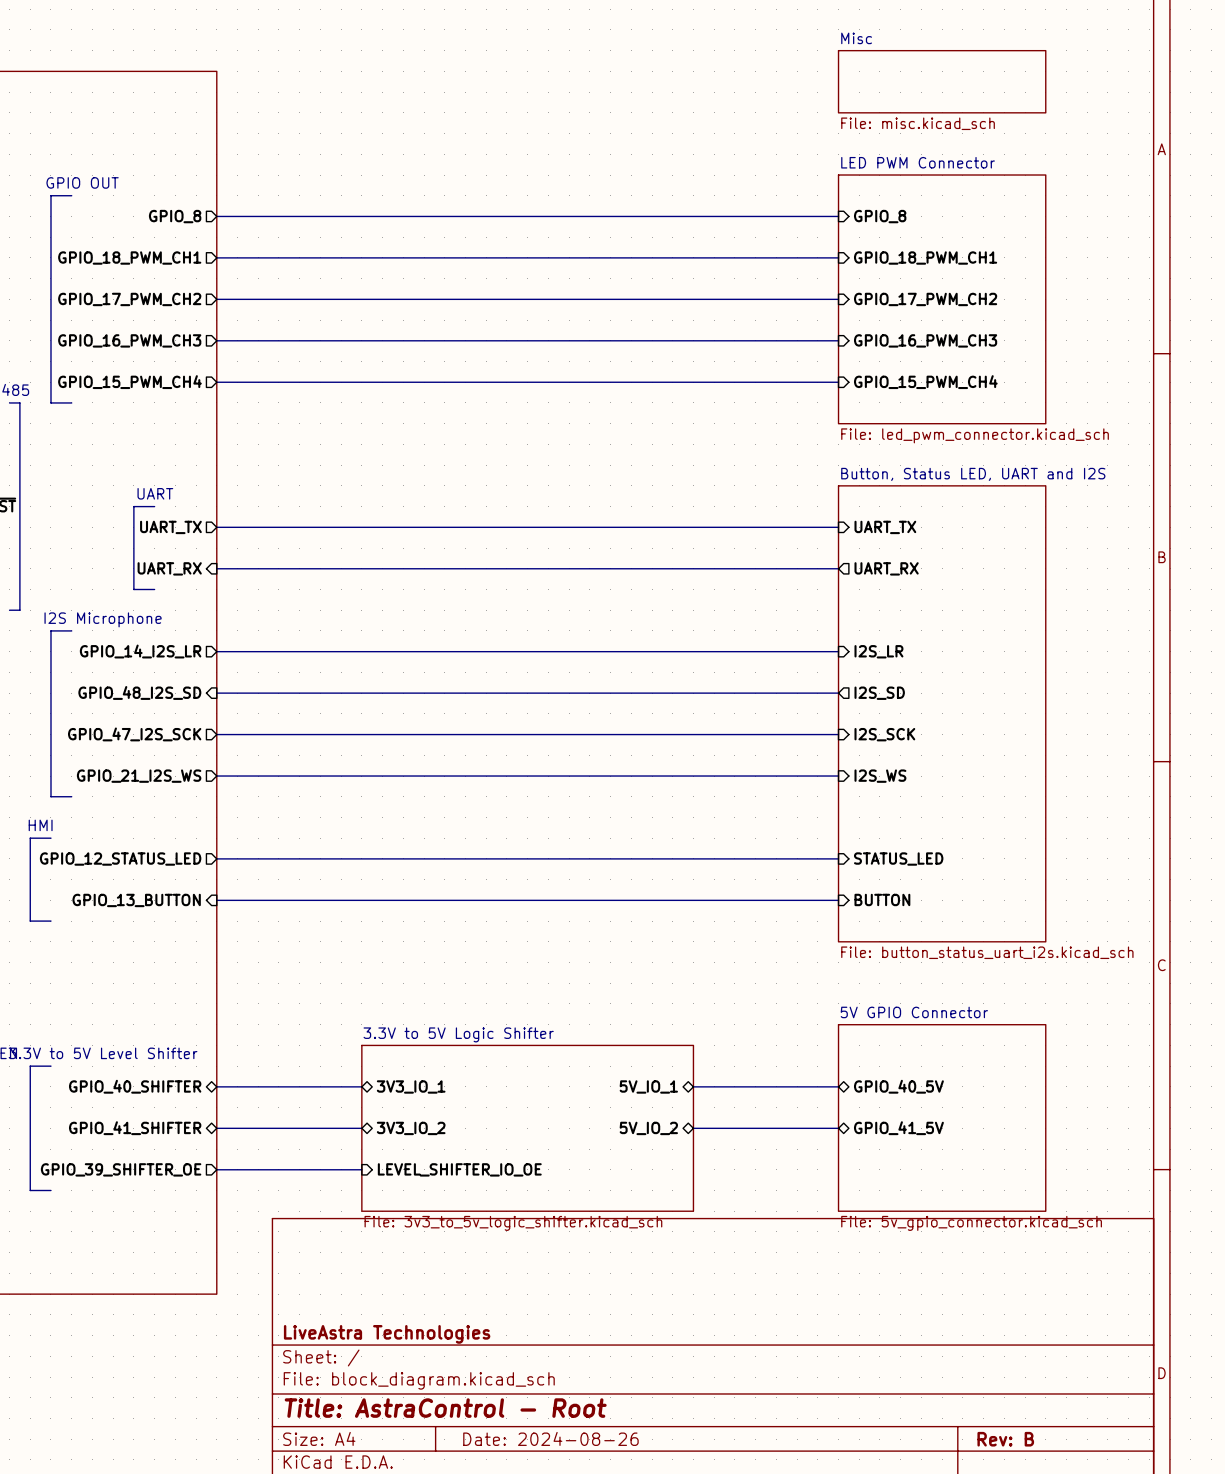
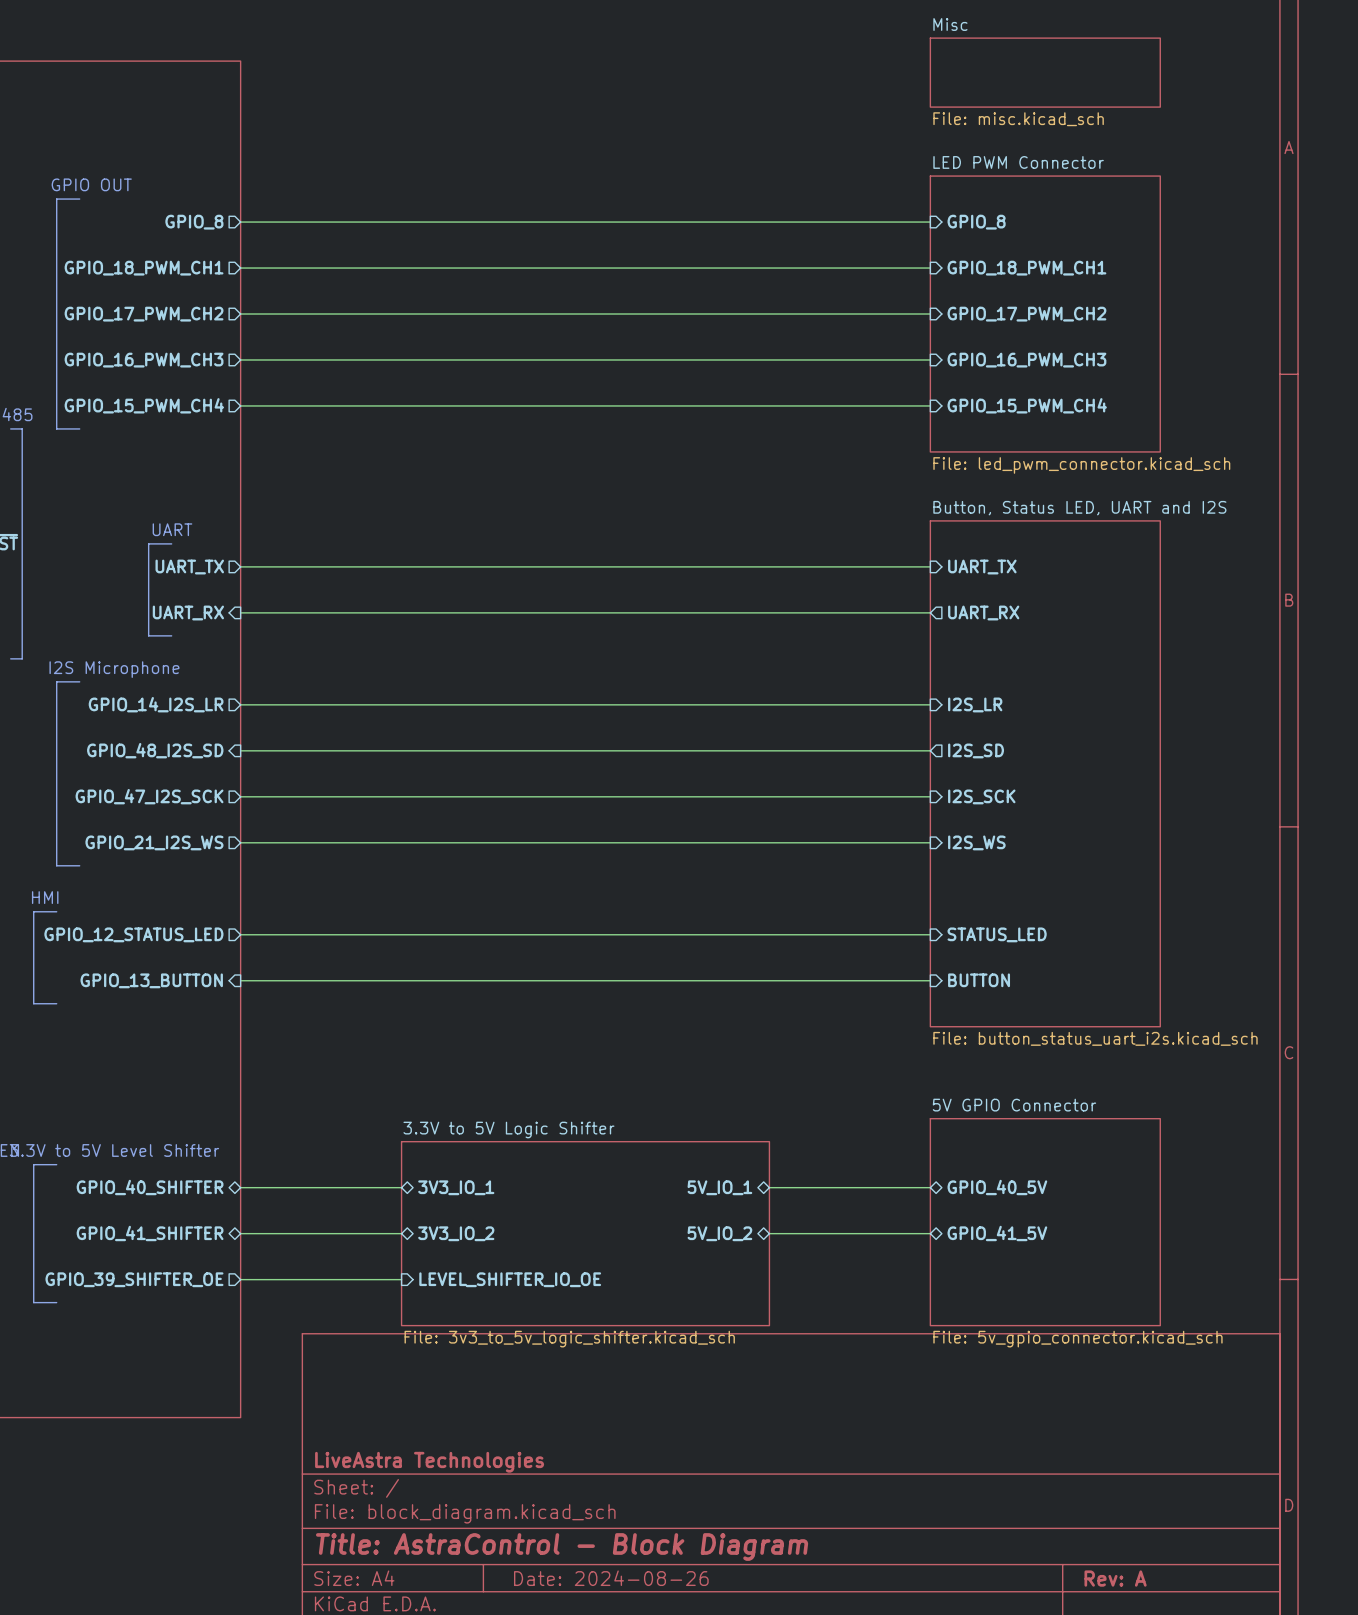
title block: Title: AstraControl - Root (445, 1408) -> Title: AstraControl - Block Diagram (562, 1547)
title block: Rev: B (1005, 1439) -> Rev: A (1115, 1578)

